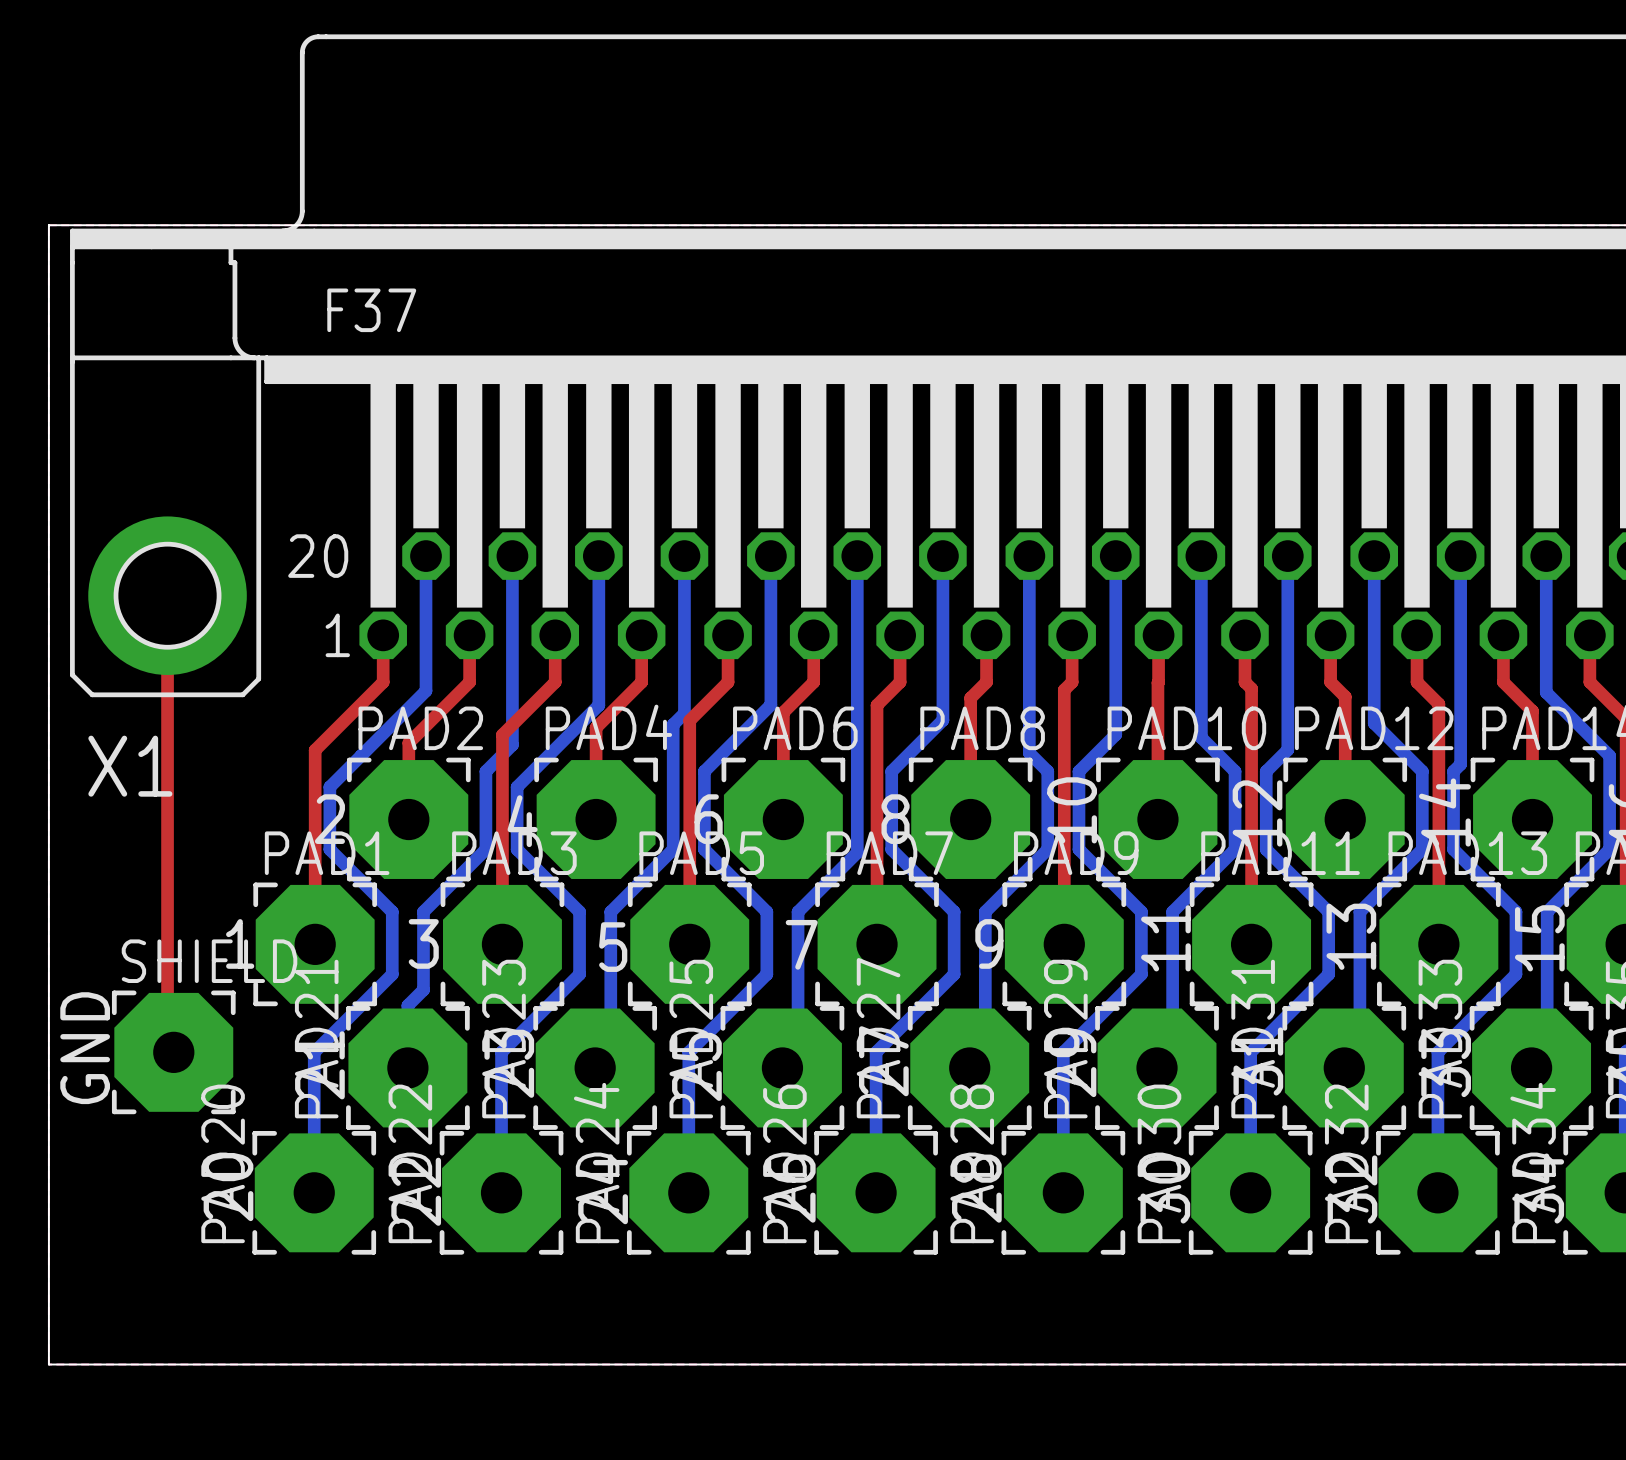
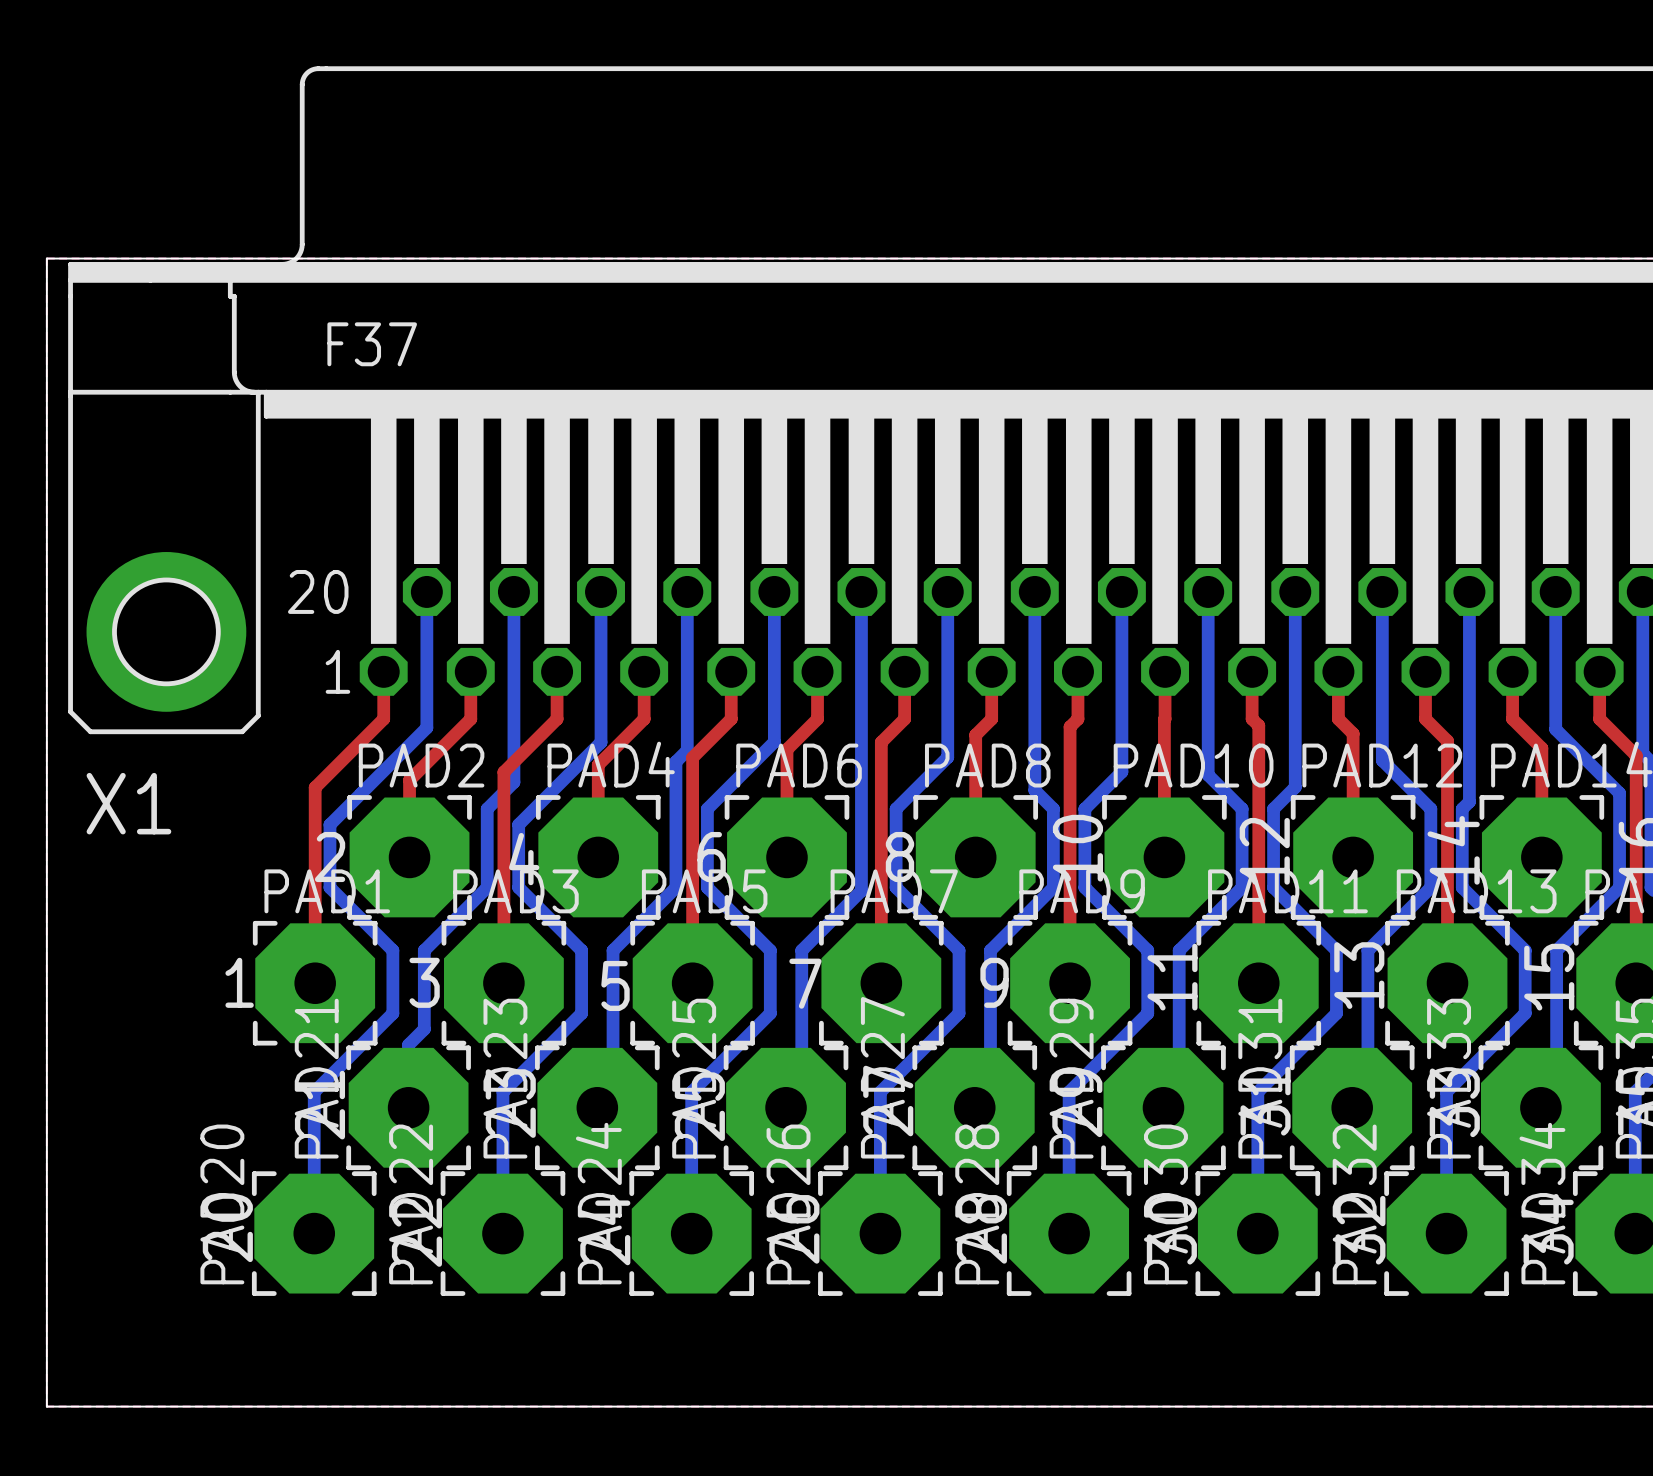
top track: (167, 595) (167, 1046) (173, 1052) -> none
text: GND (85, 1048) -> none
SHIELD: (173, 1052) -> none

